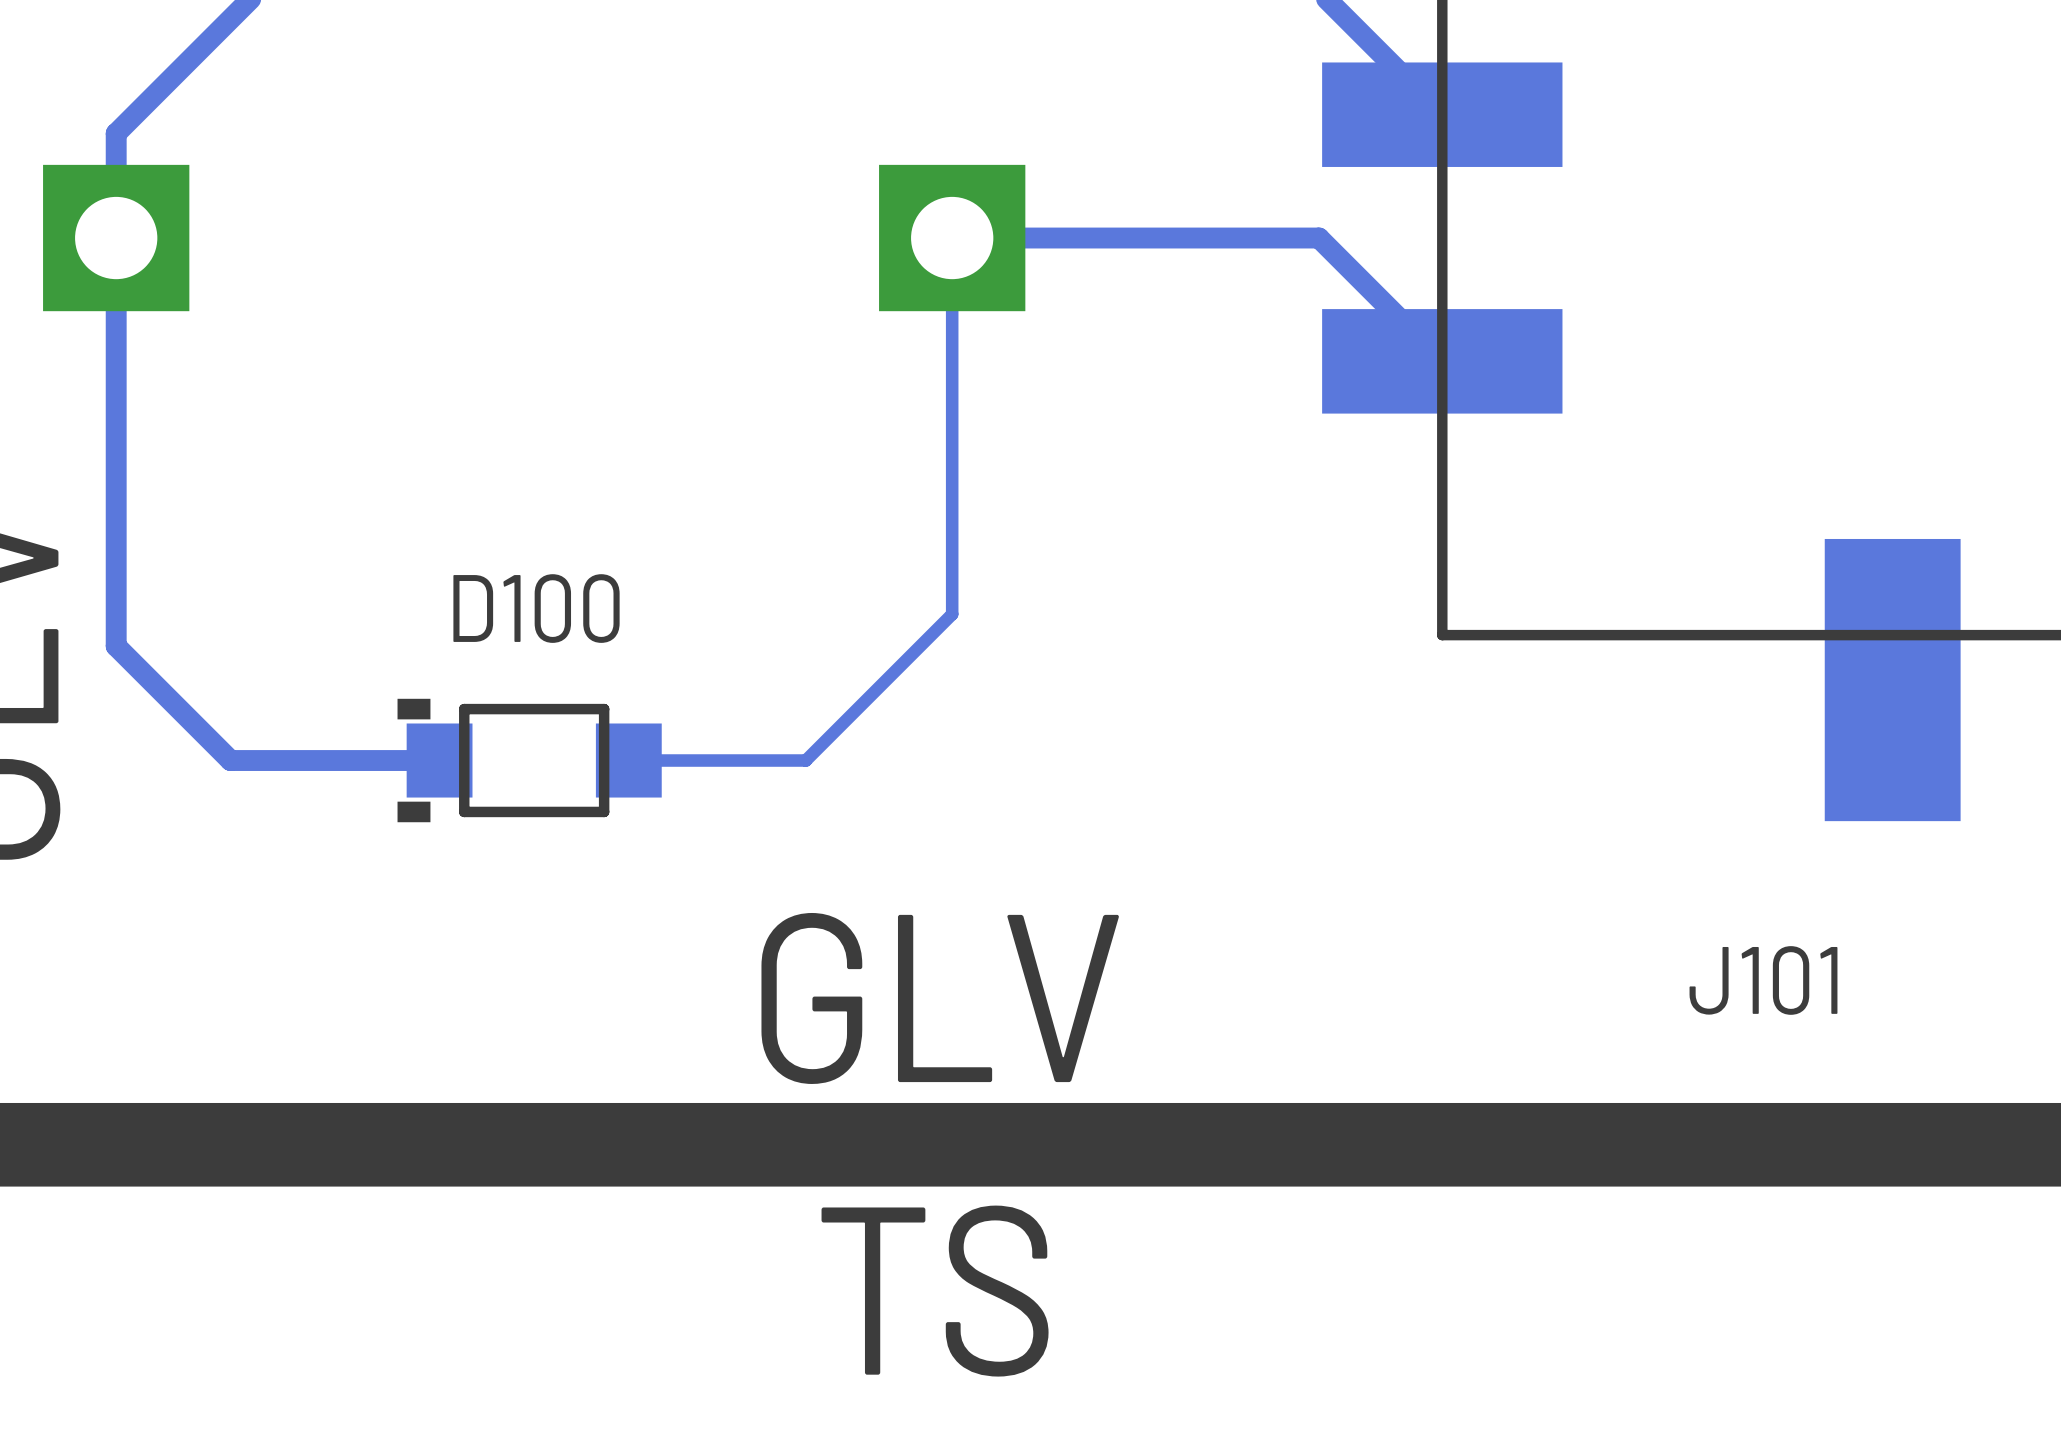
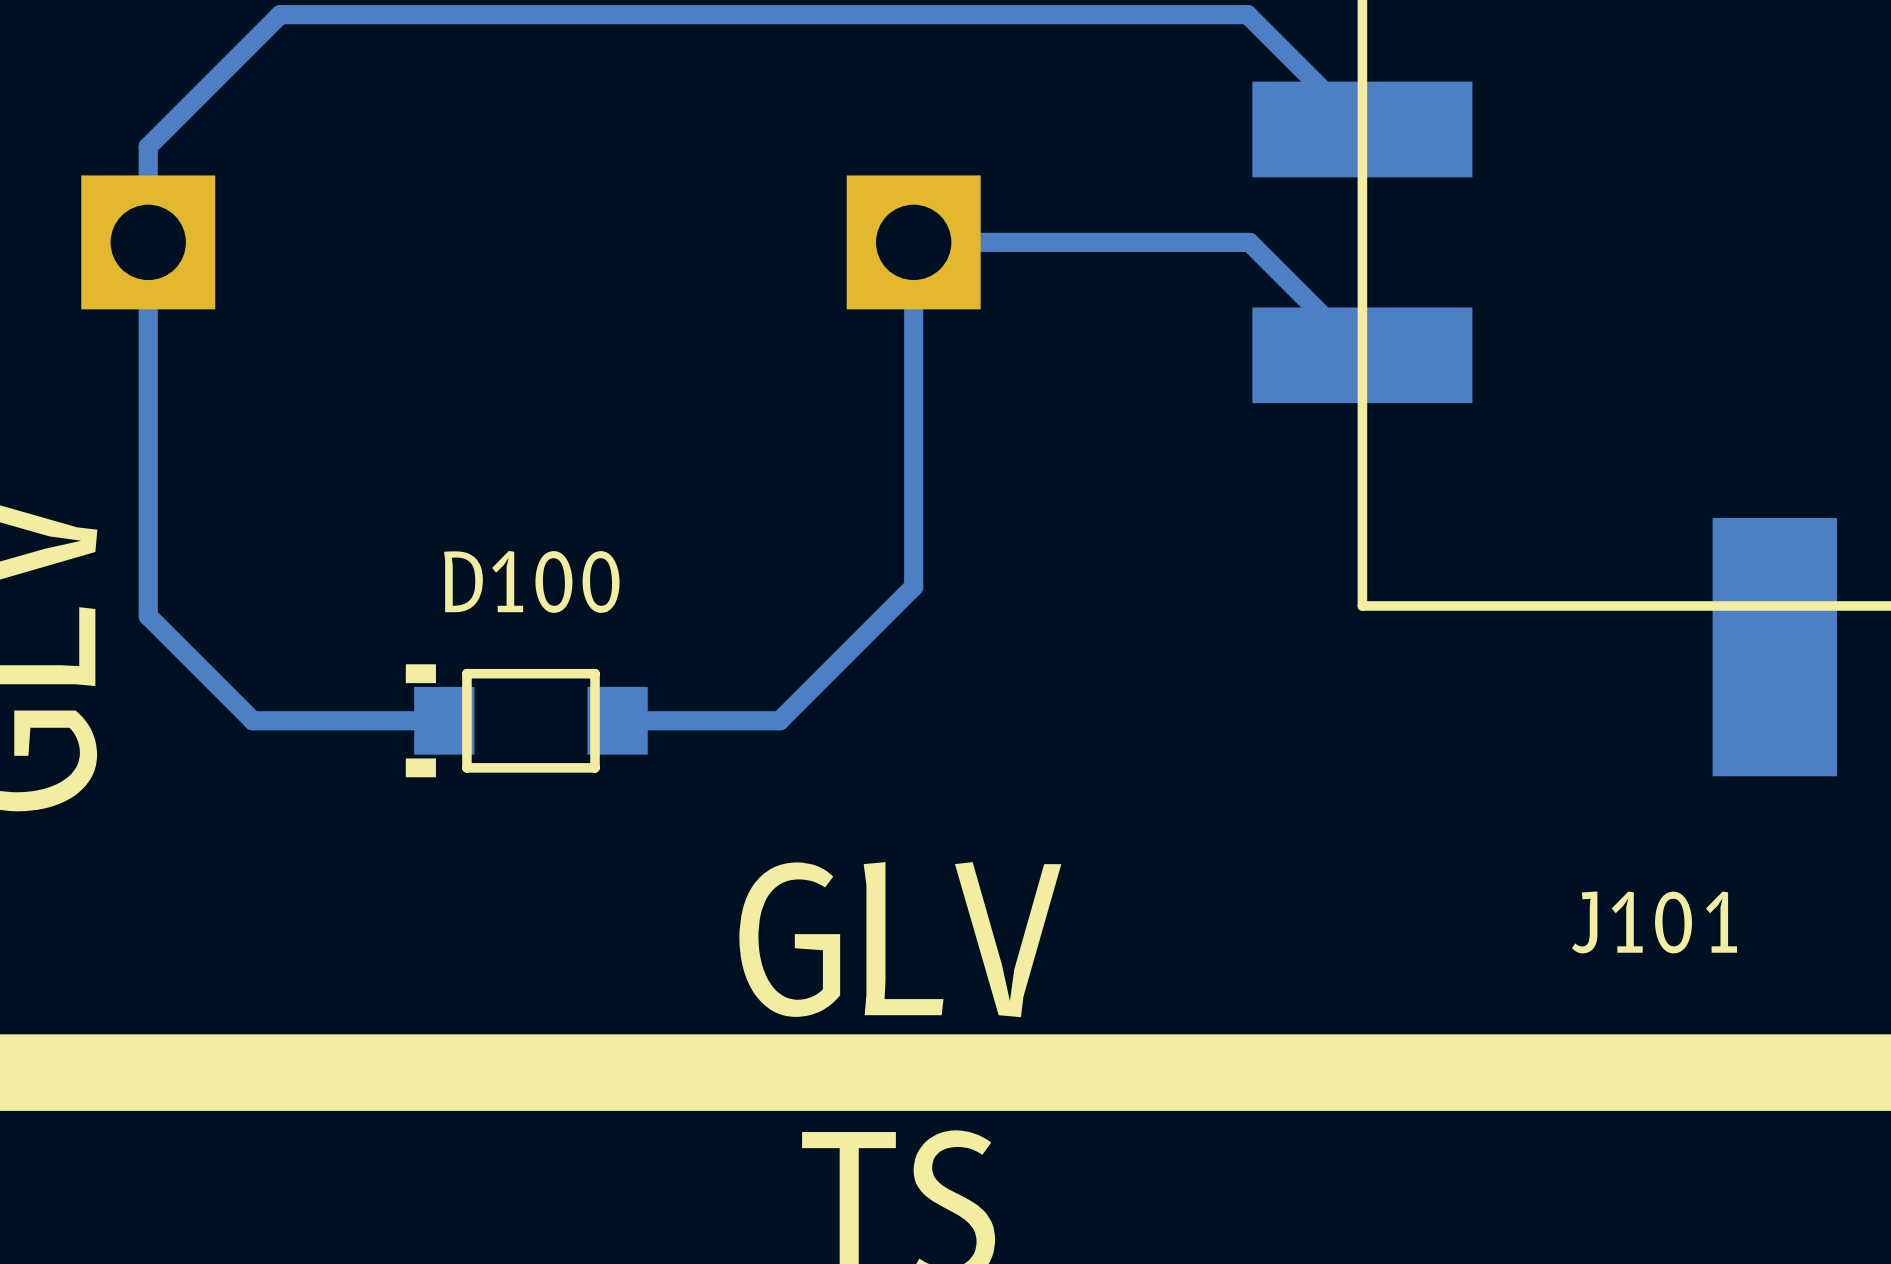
bottom track width: thin (952, 238) (952, 614) (805, 760) (628, 760) -> thick (913, 242) (913, 586) (779, 720) (617, 720)

